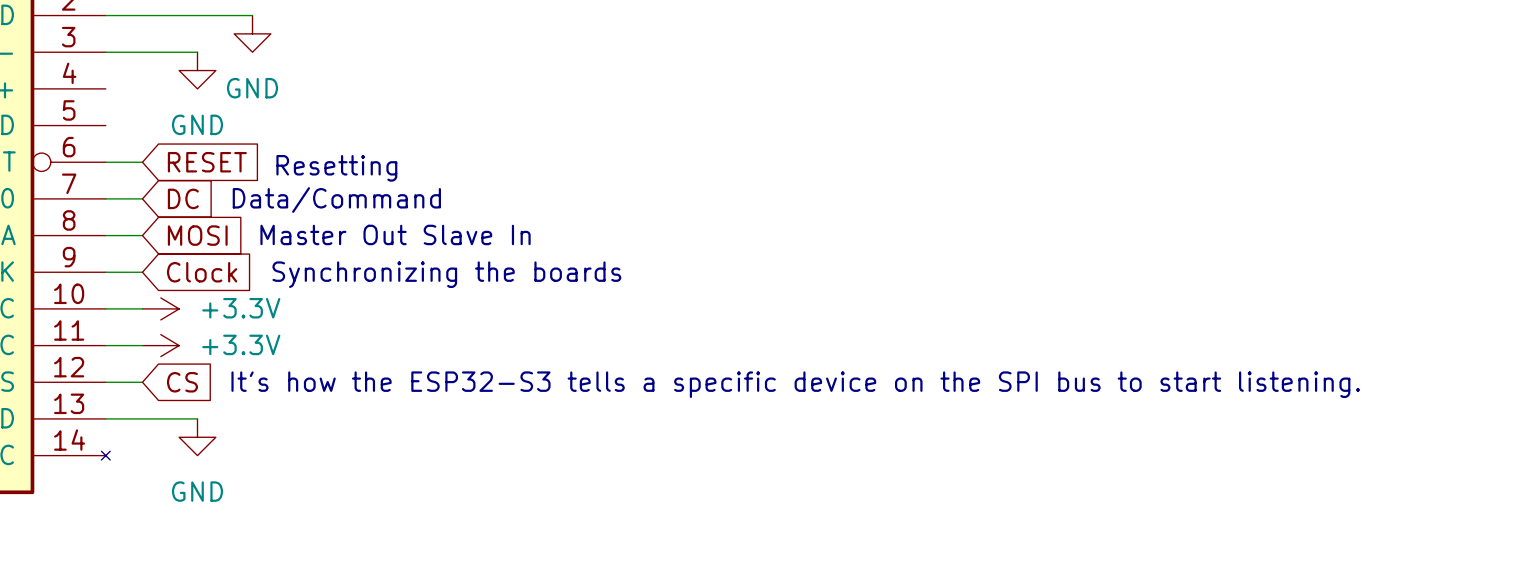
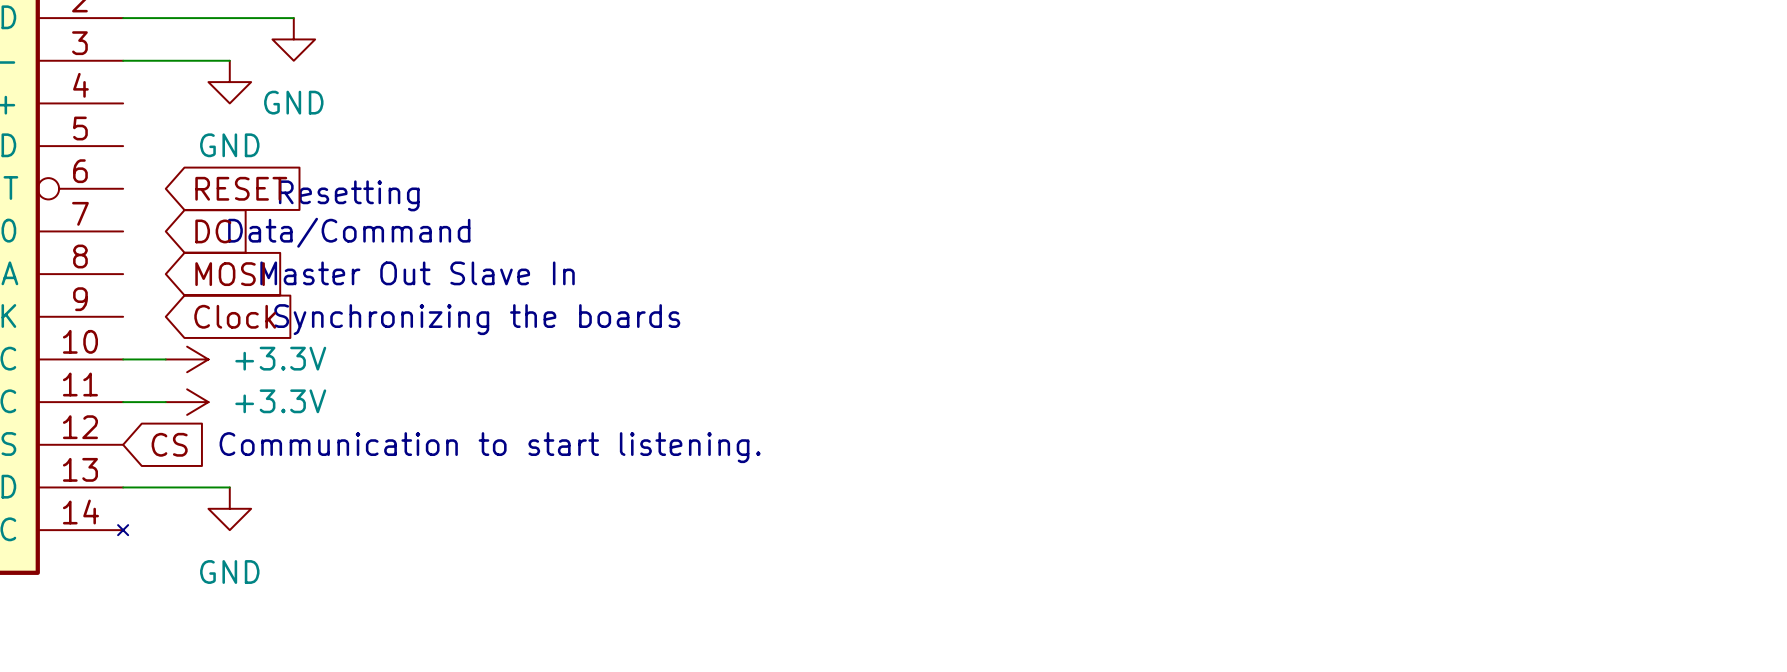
wire: (105, 162) (142, 162) -> none
text position: Resetting (336, 168) -> Resetting (349, 195)
wire: (105, 198) (142, 198) -> none
text position: Data/Command (336, 200) -> Data/Command (349, 232)
text position: Master Out Slave In (395, 234) -> Master Out Slave In (417, 273)
wire: (105, 235) (142, 235) -> none
wire: (105, 272) (142, 272) -> none
text position: Synchronizing the boards (446, 274) -> Synchronizing the boards (477, 319)
wire: (105, 382) (142, 382) -> none
global label position: CS (182, 382) -> CS (169, 444)
text: none -> Communication to start listening. (490, 447)
text: It's how the ESP32-S3 tells a specific device on the SPI bus to start listening. (795, 384) -> none

